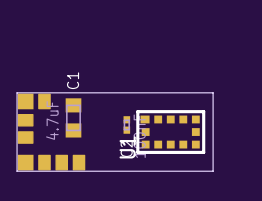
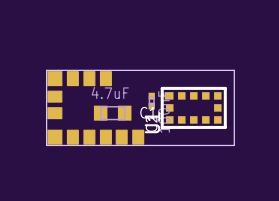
part: none -> (89, 78)
part: none -> (105, 78)
C1 rotation: 0° (73, 117) -> 90° clockwise (112, 113)
part: none -> (121, 137)
part: none -> (138, 137)

